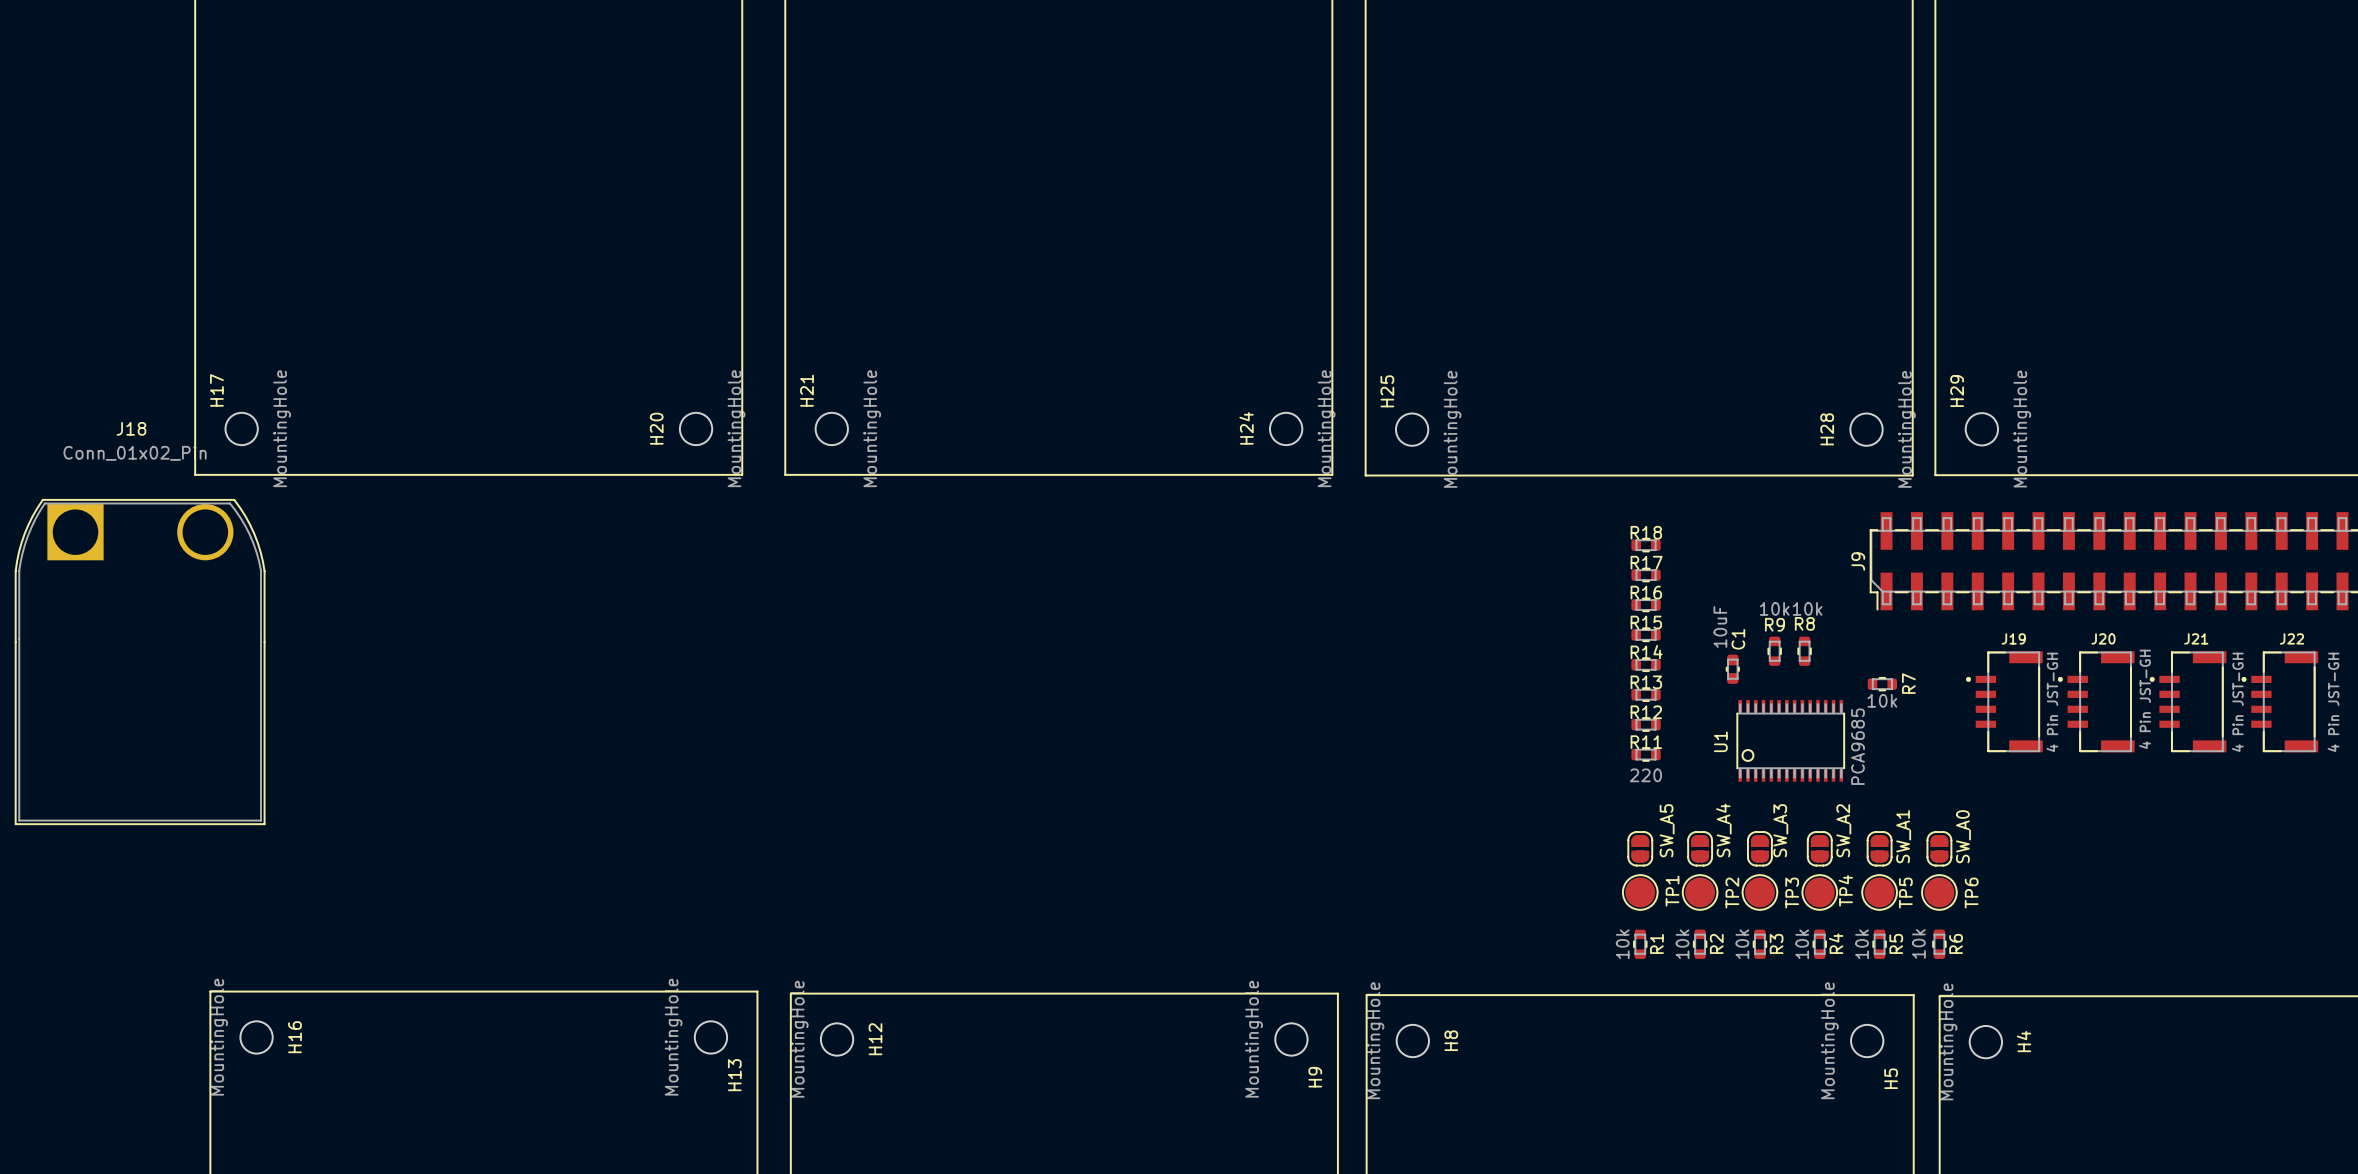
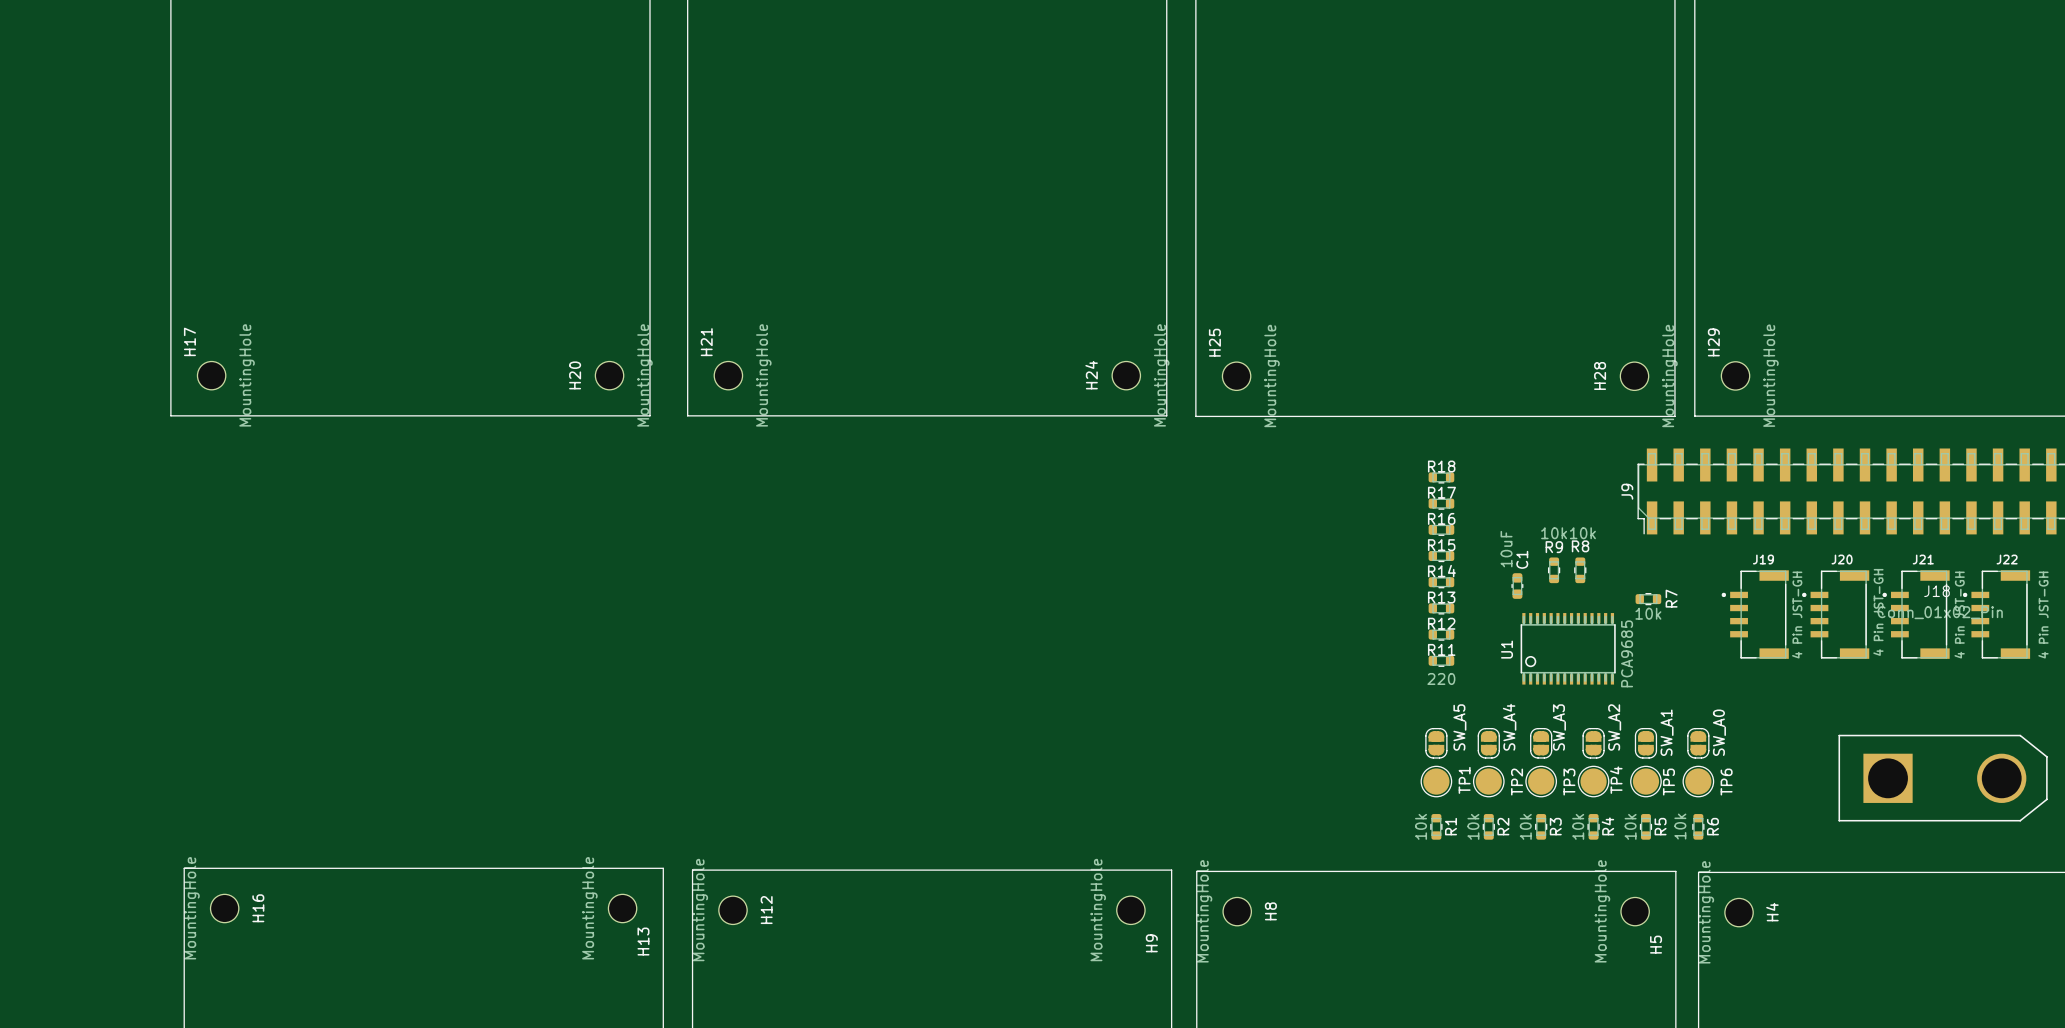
J18 footprint: [14, 498, 266, 826] -> [1838, 734, 2048, 822]

